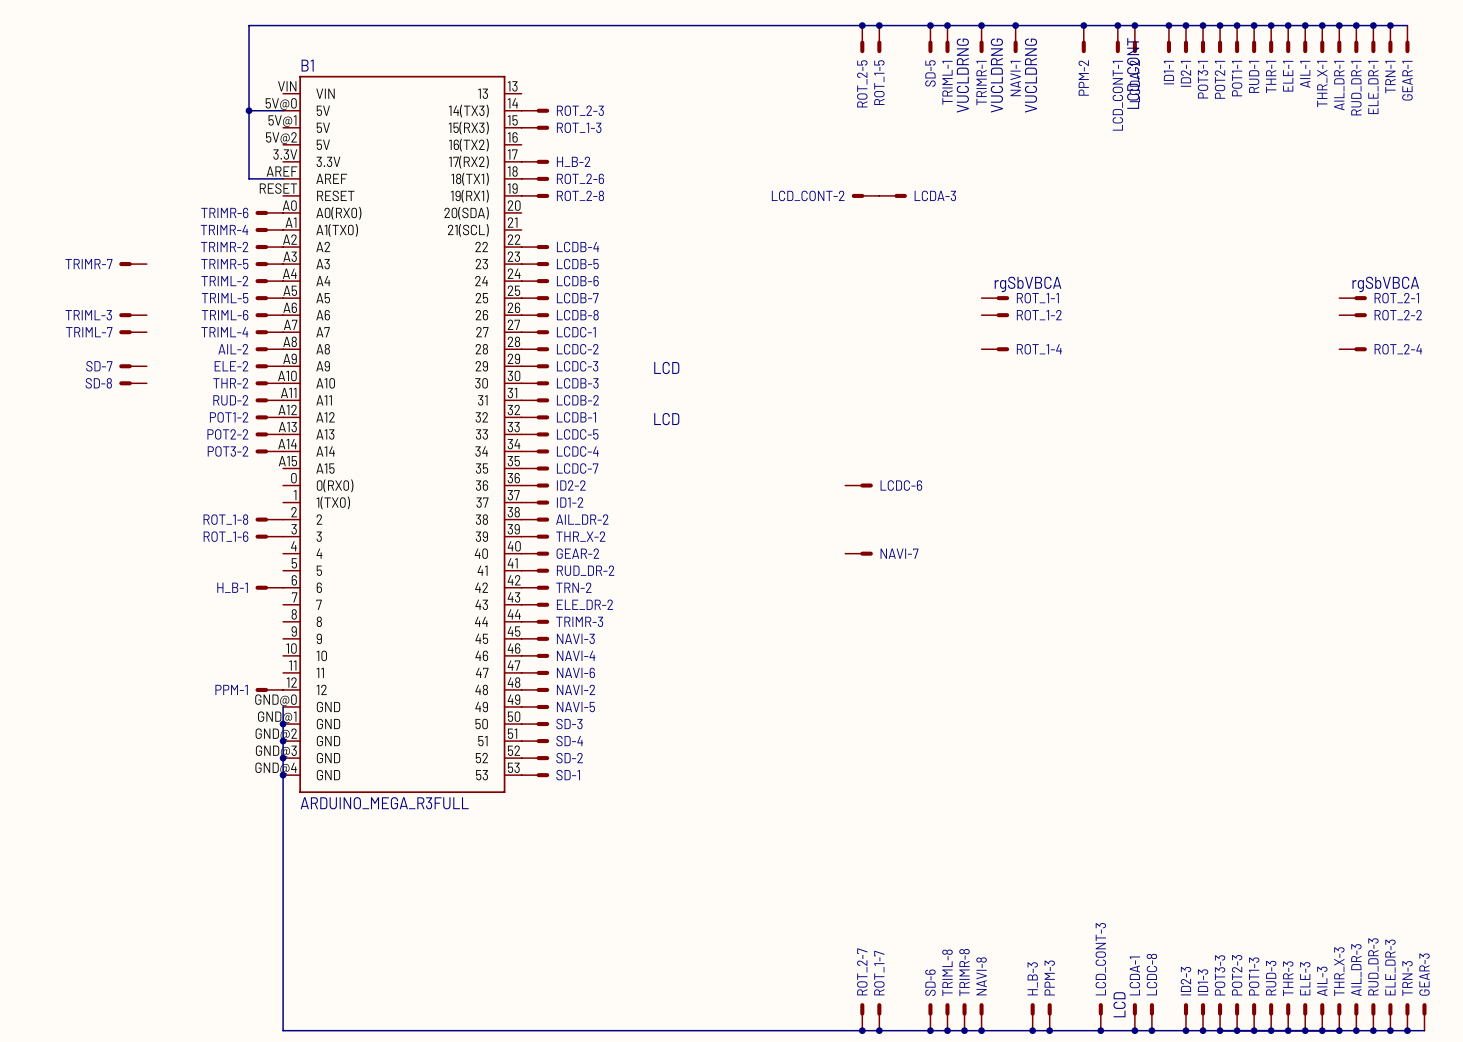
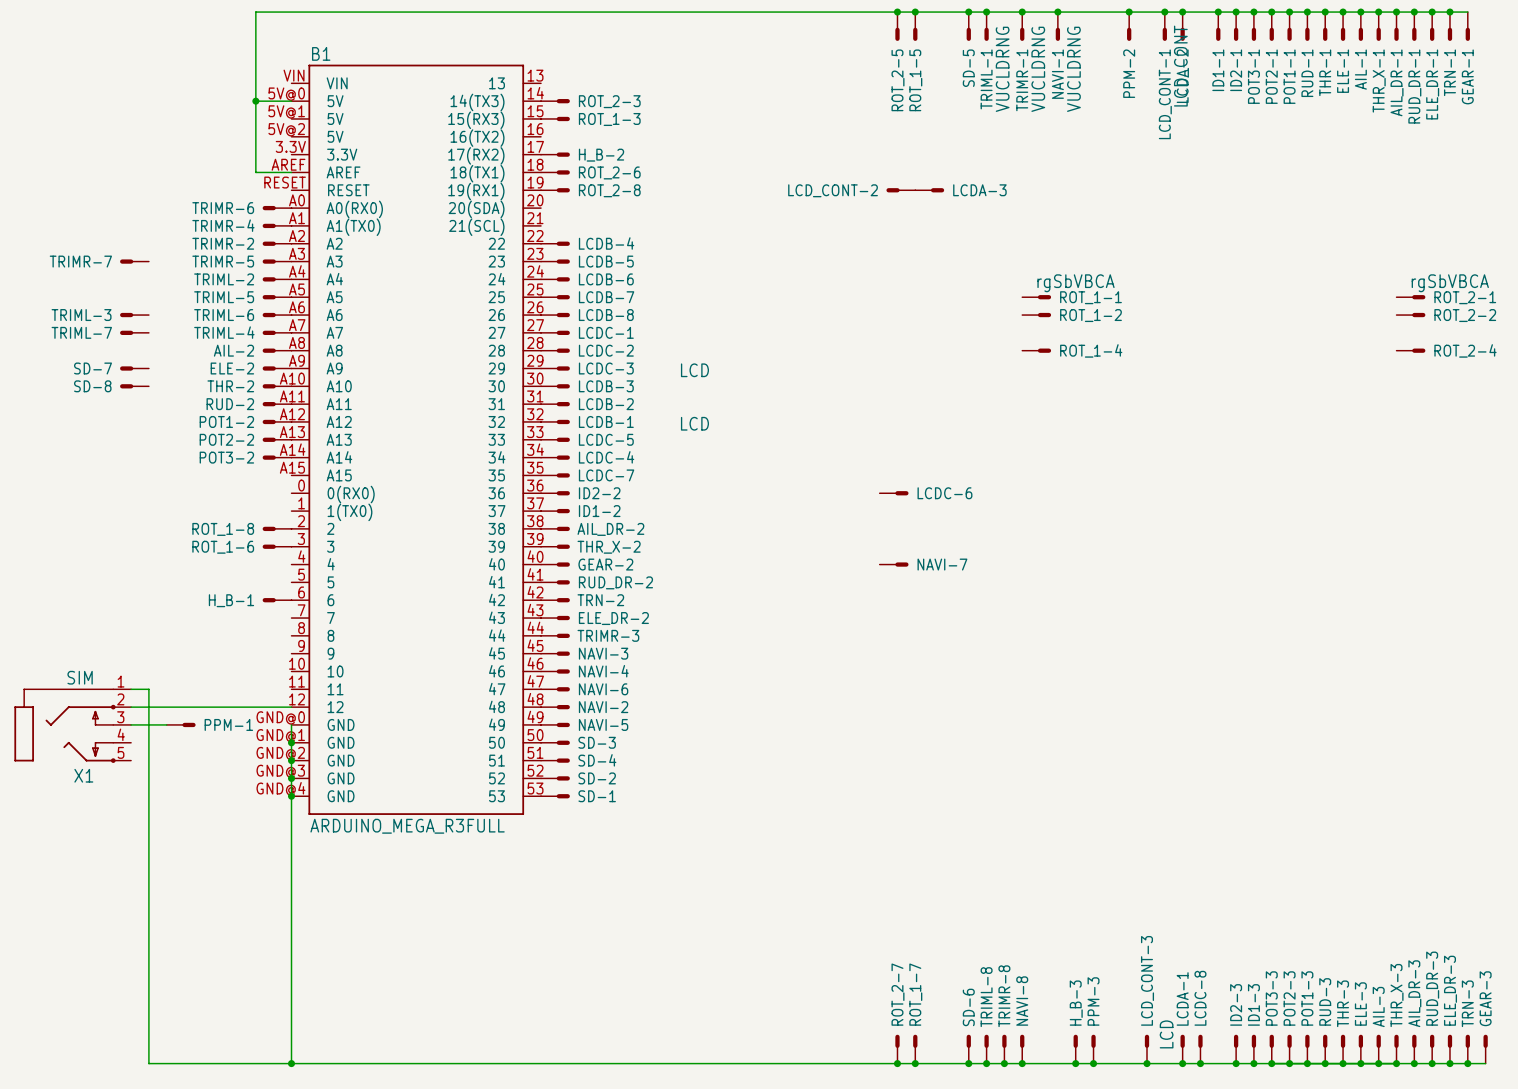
wire: none -> (131, 689) (148, 689) (148, 1063) (291, 1063)
wire: none -> (131, 707) (291, 707)
PPM-1 rotation: 0° (261, 689) -> 180° (189, 724)
PPM-1 position: (269, 689) -> (181, 724)
wire: none -> (131, 724) (166, 724)
X1: none -> SIM (72, 725)
junction: none -> (291, 1063)

